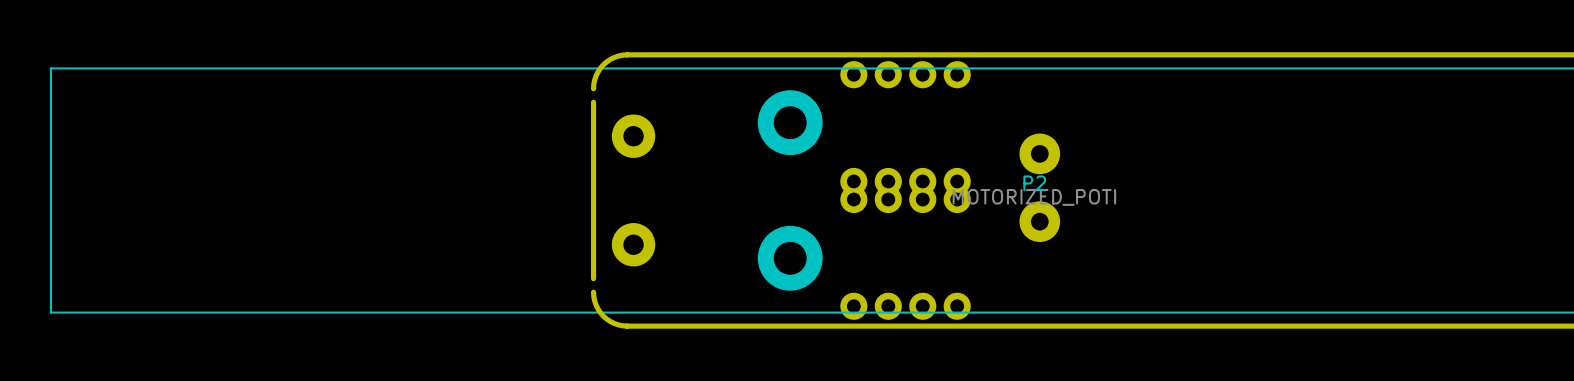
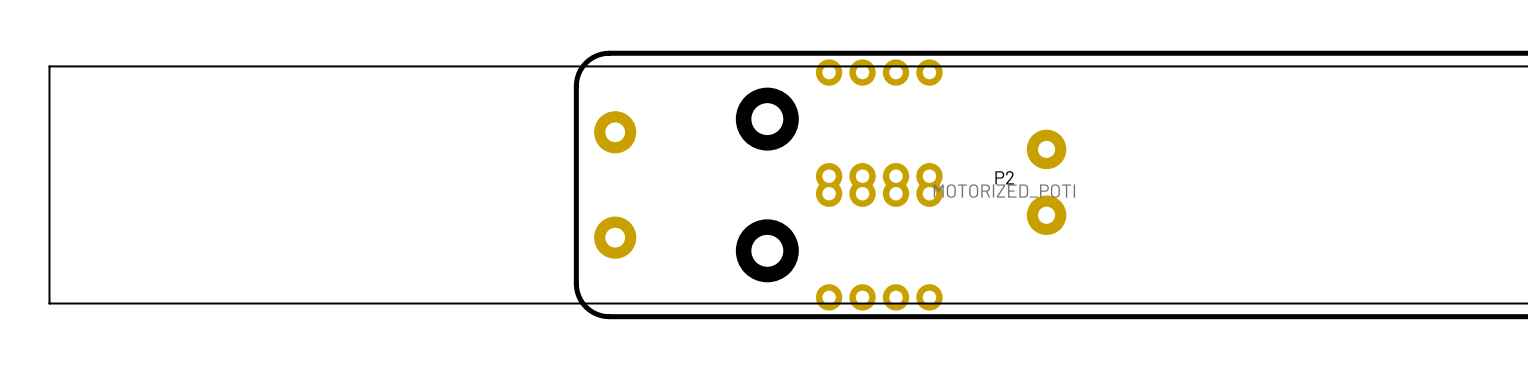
board edge: none -> (576, 86) (576, 99)
part position: (1039, 187) -> (1046, 182)
board edge: none -> (576, 270) (576, 283)

